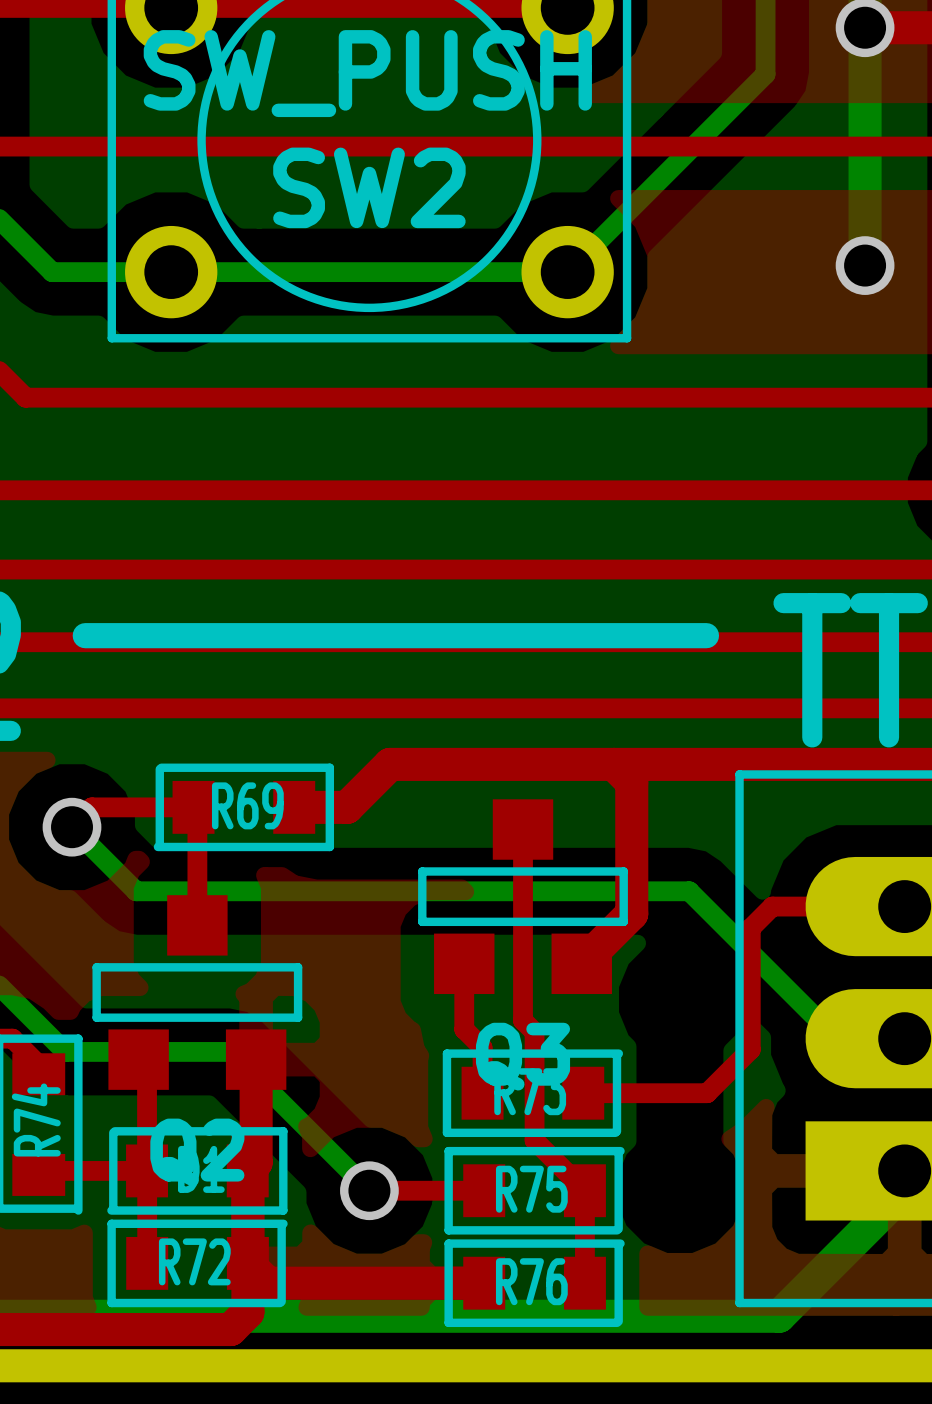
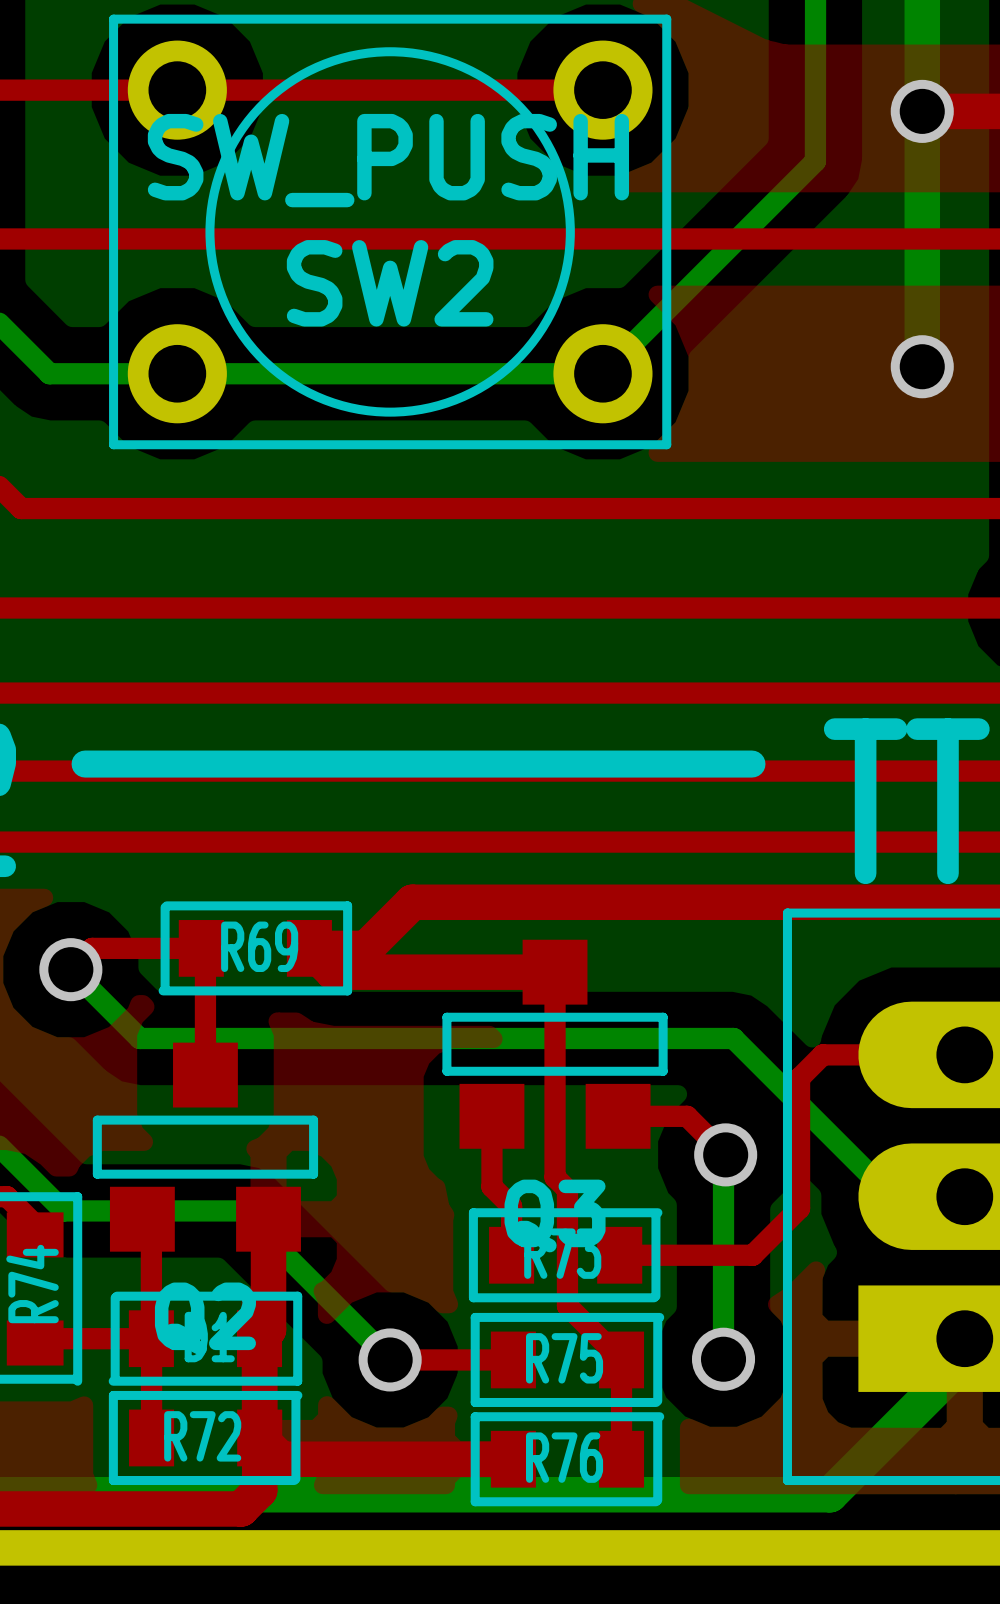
top track: (613, 764) (631, 782) (631, 913) (581, 963) -> (725, 1154) (687, 1116) (618, 1116)
top track: none -> (309, 948) (333, 972) (555, 972)
bottom track: none -> (725, 1154) (723, 1157) (723, 1359)
via: none -> (725, 1154)
via: none -> (723, 1359)

